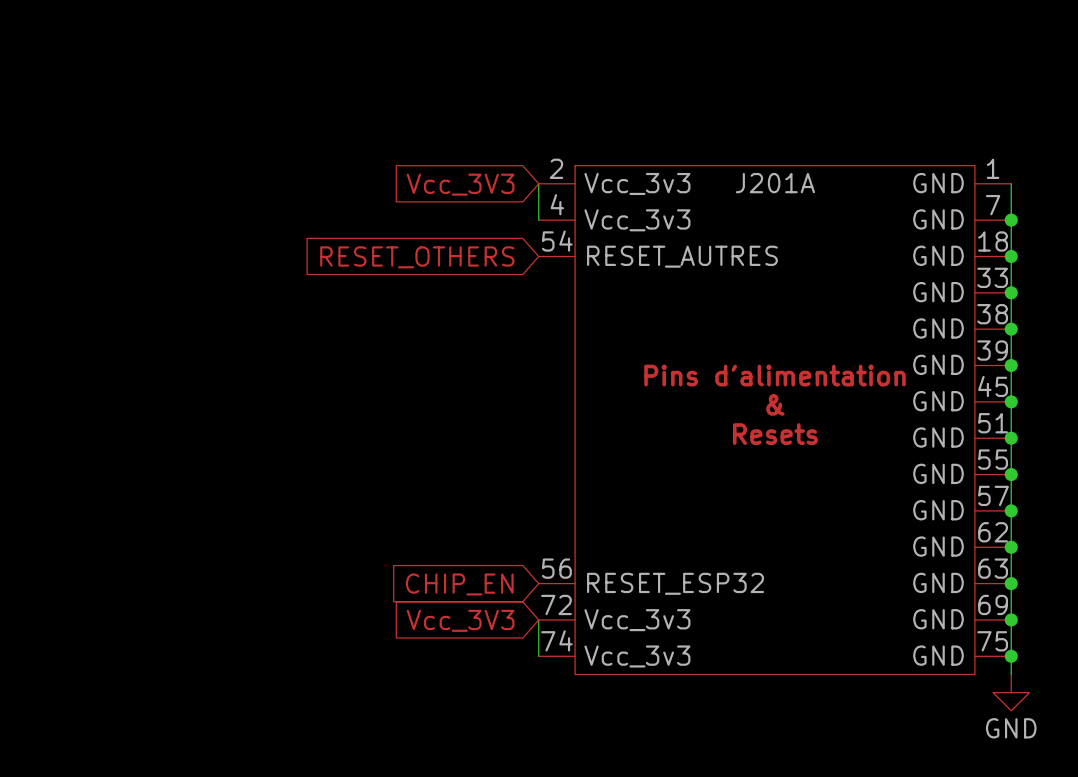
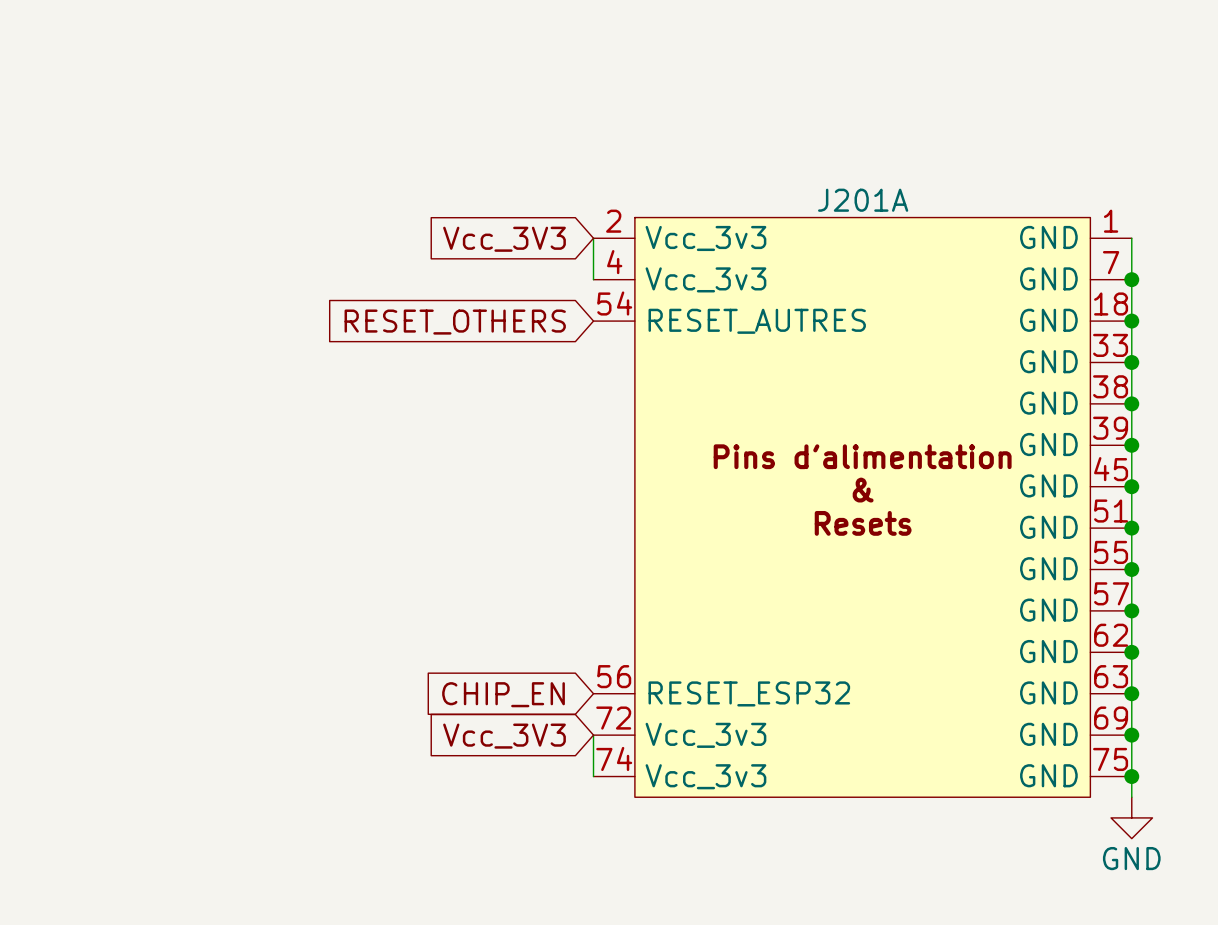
J201A name position: J201A (775, 183) -> J201A (863, 200)

